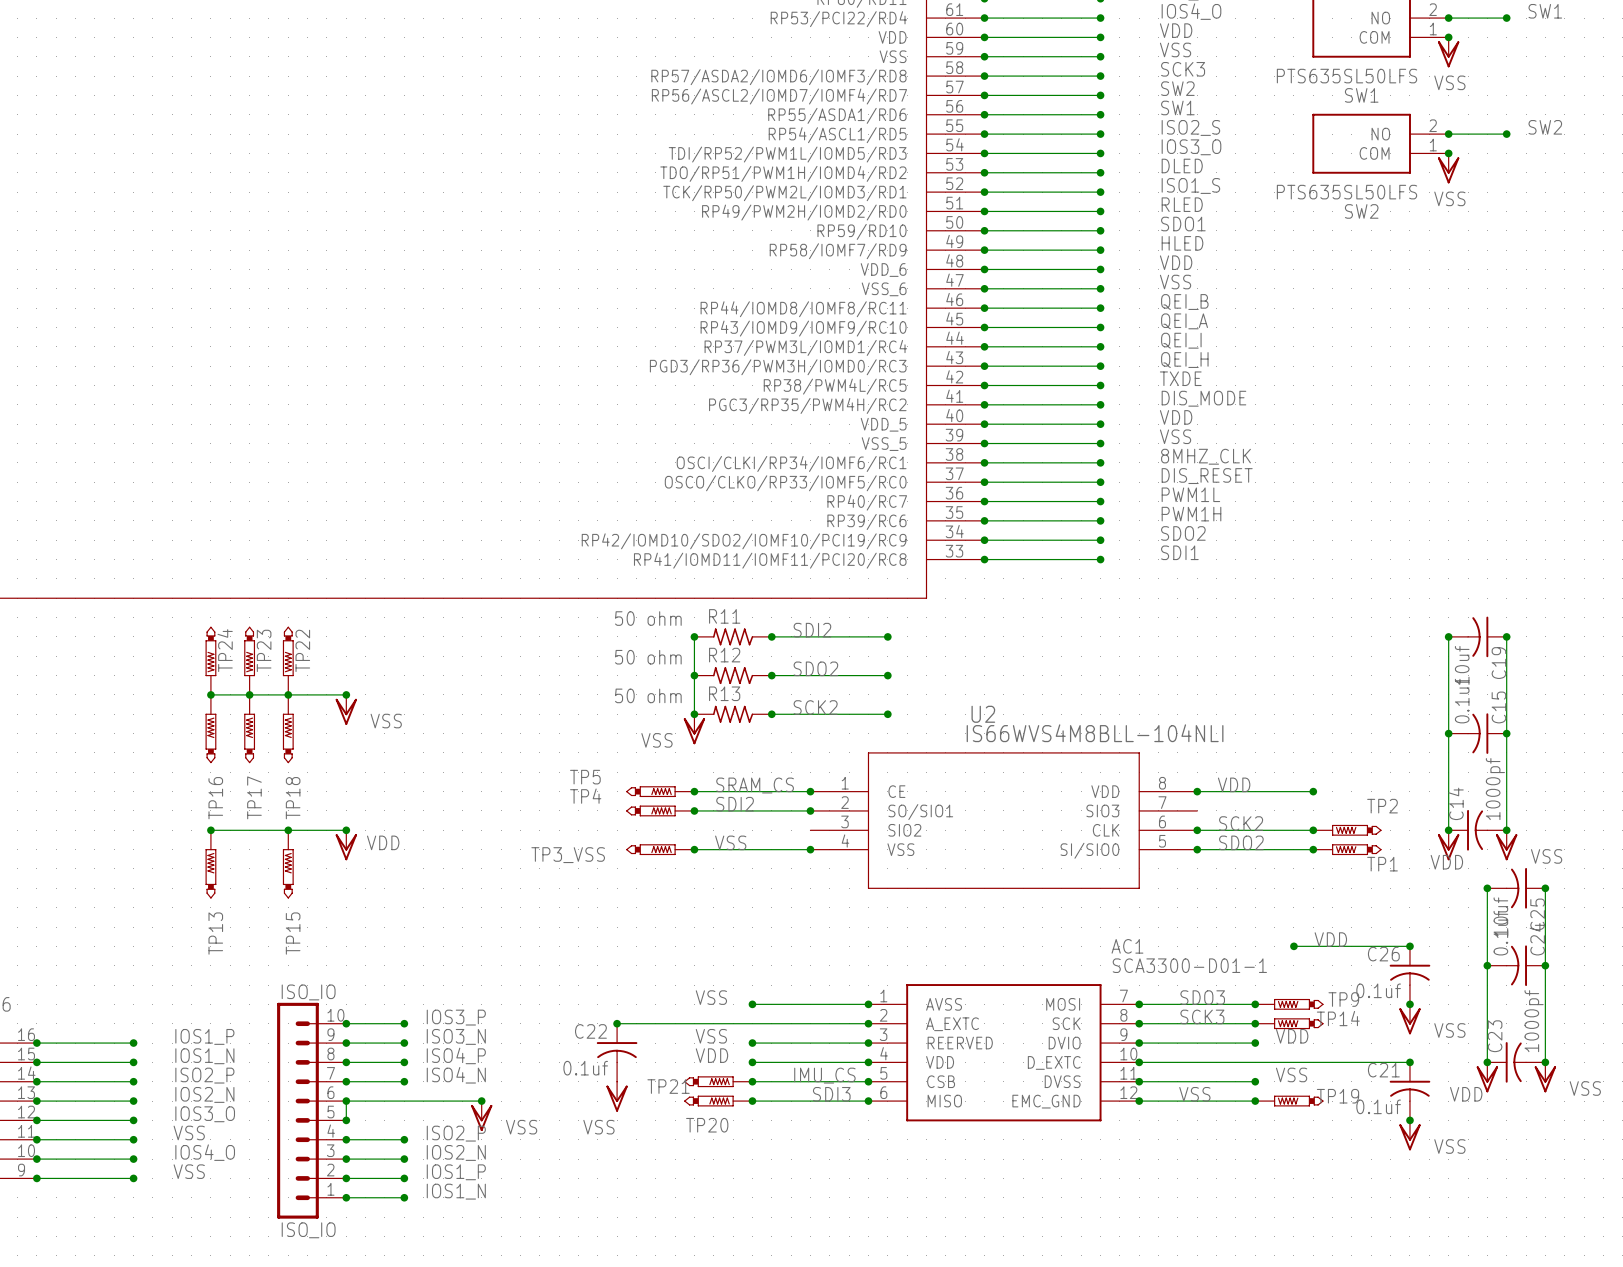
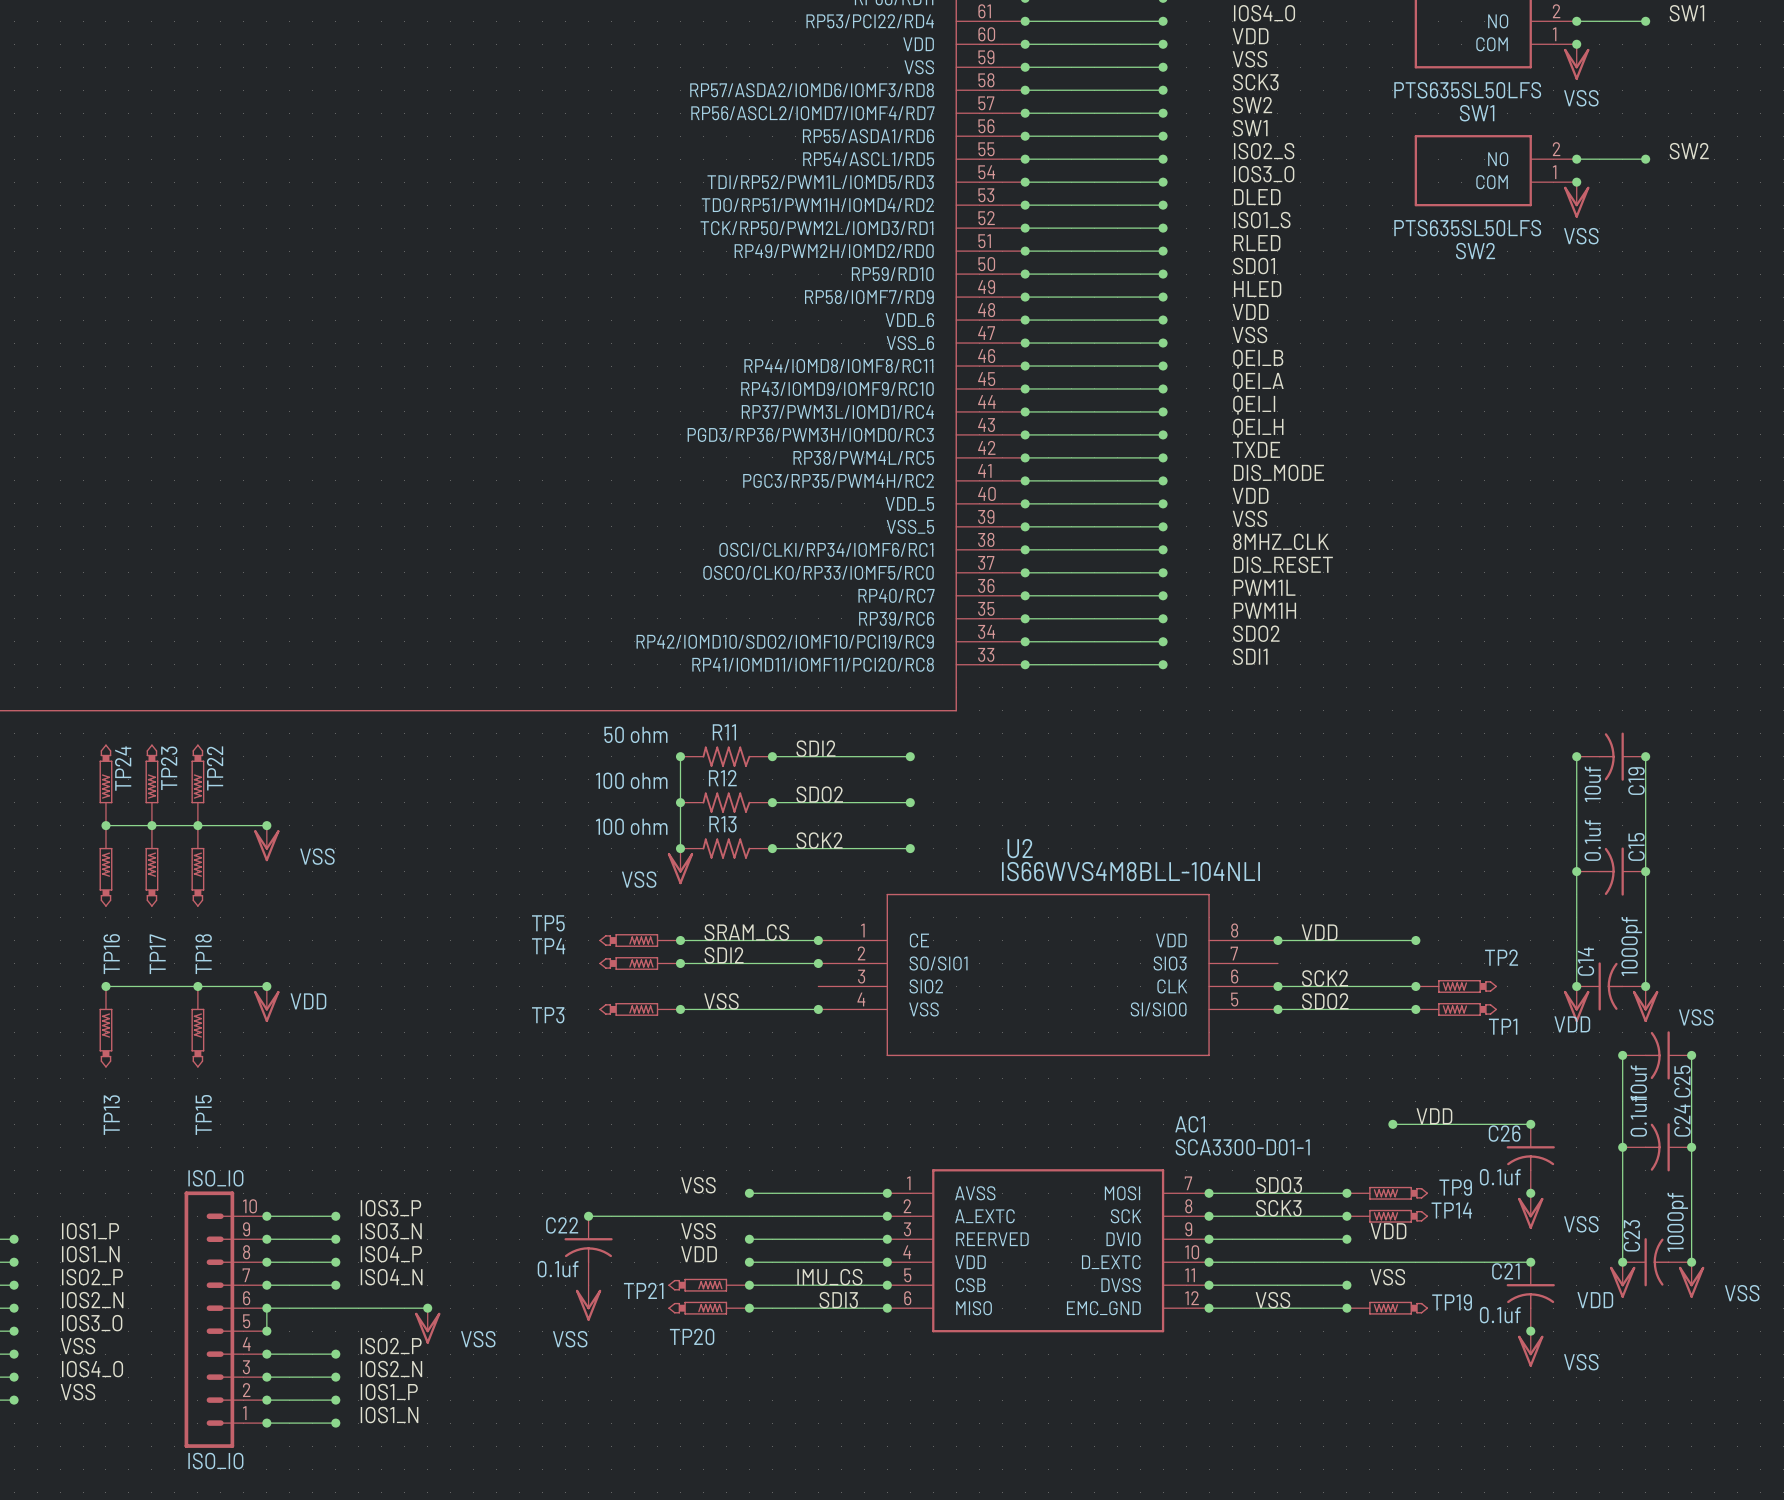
R12 value: 50 ohm (648, 657) -> 100 ohm (631, 780)
R13 value: 50 ohm (648, 695) -> 100 ohm (631, 826)
TP3_VSS name: TP3_VSS (568, 855) -> TP3 (548, 1015)

